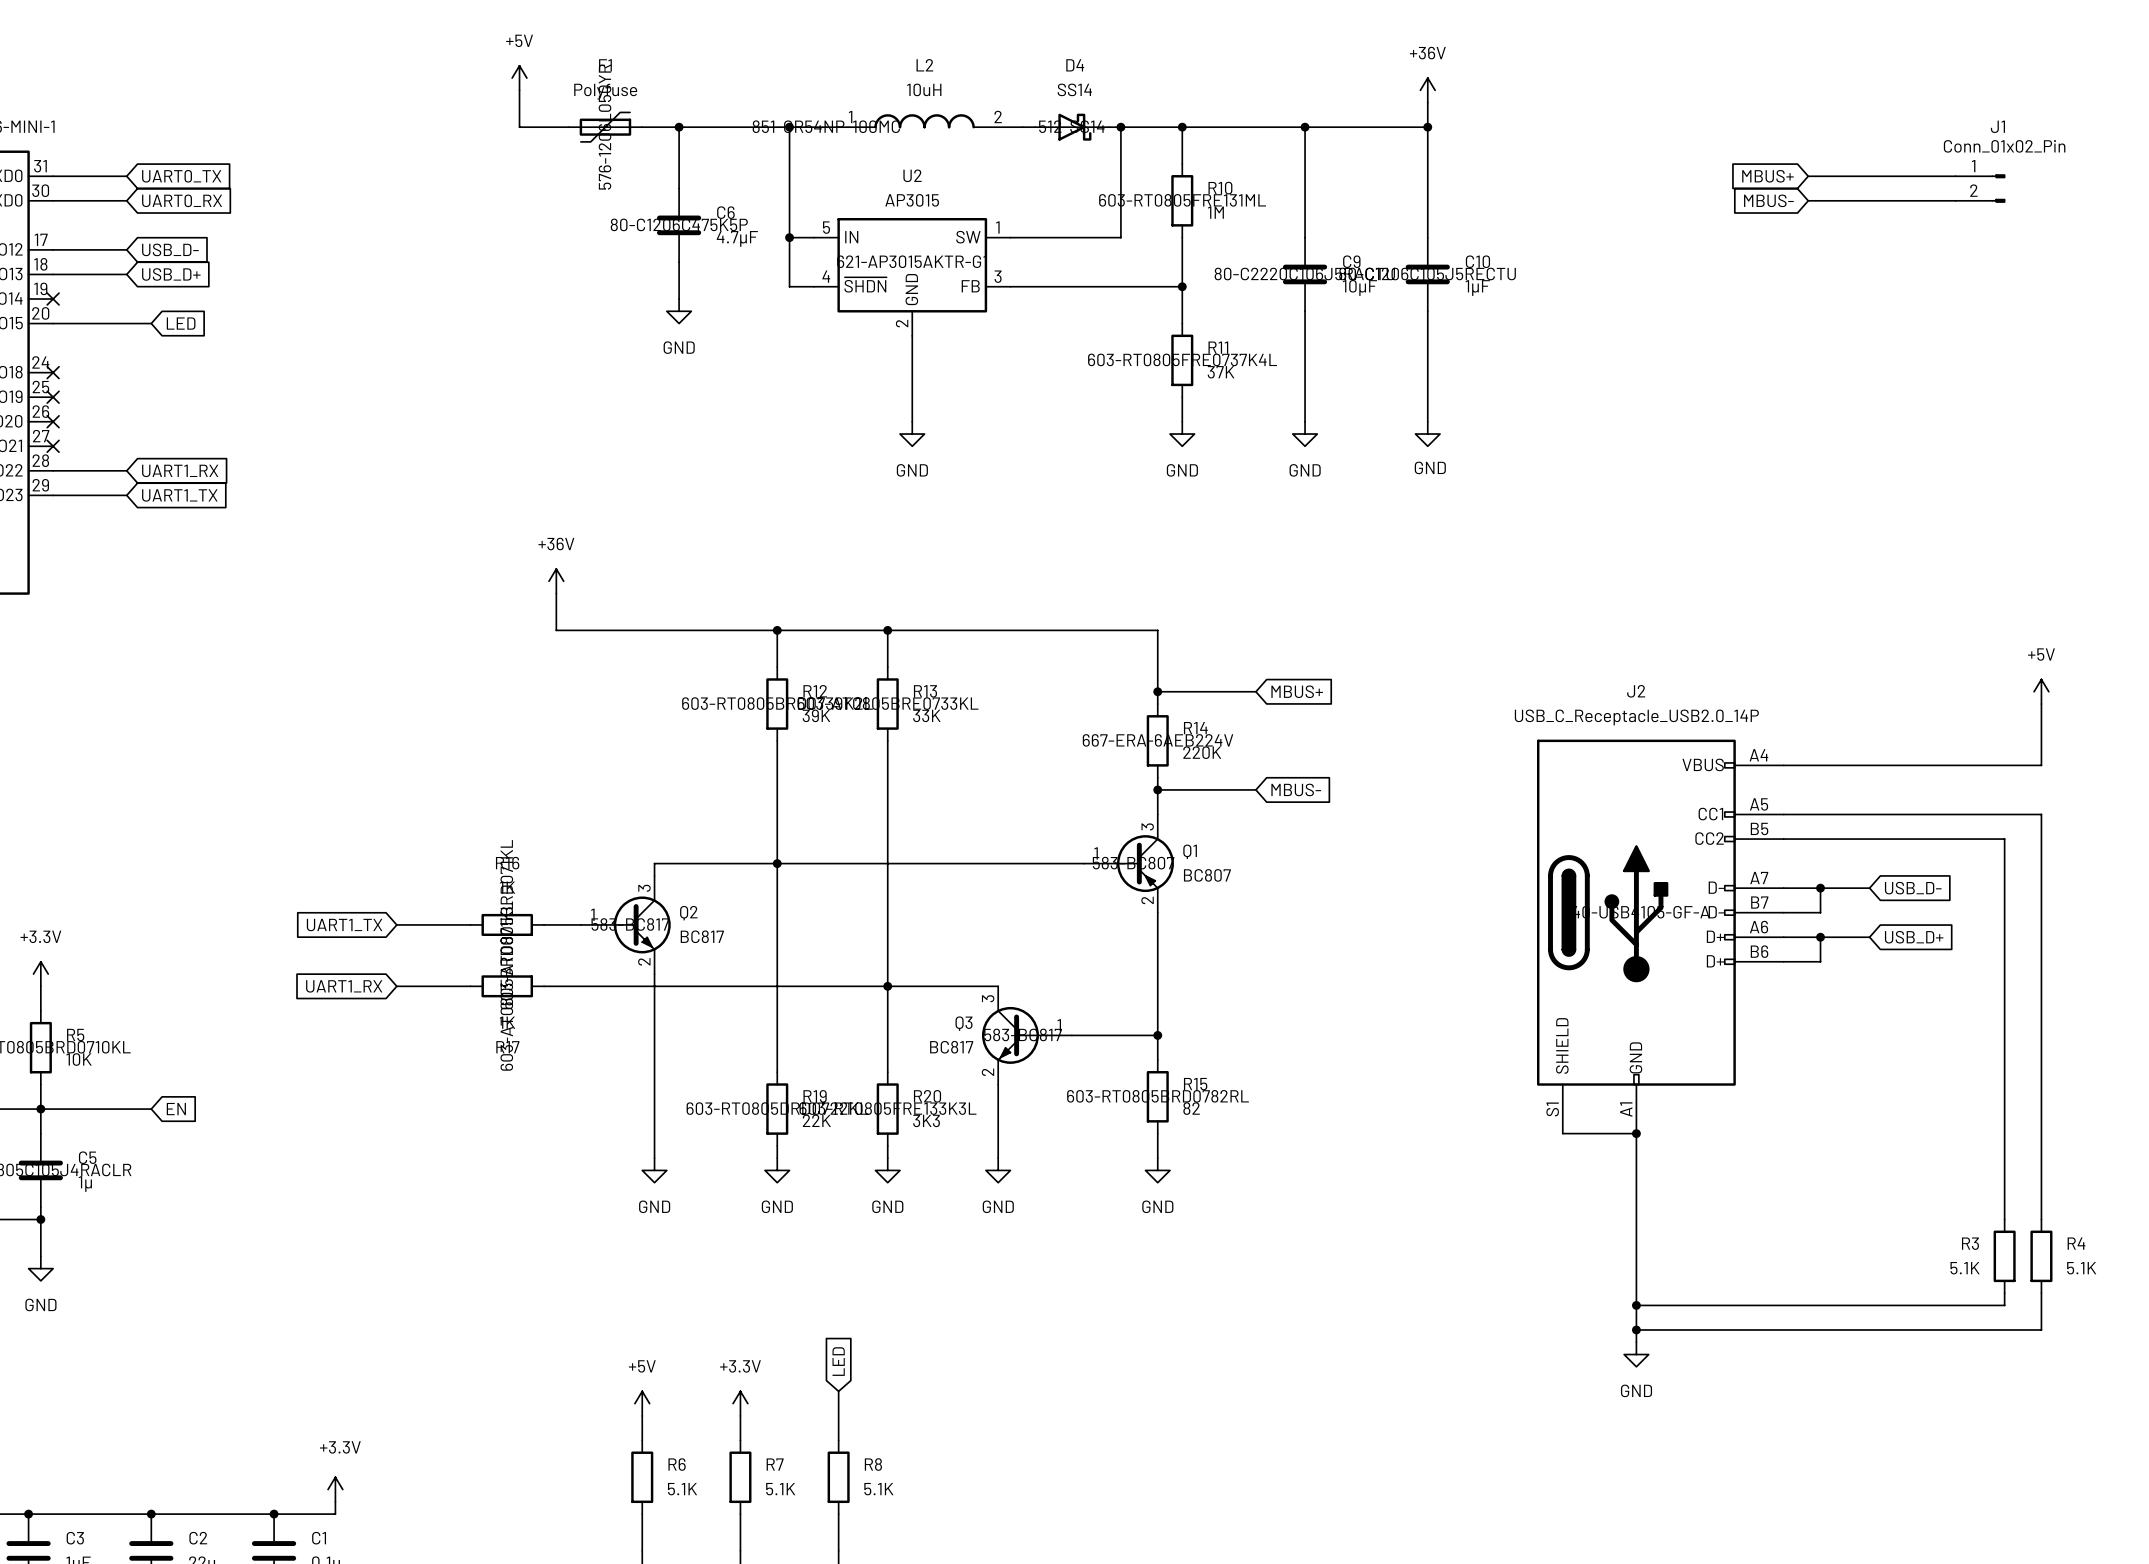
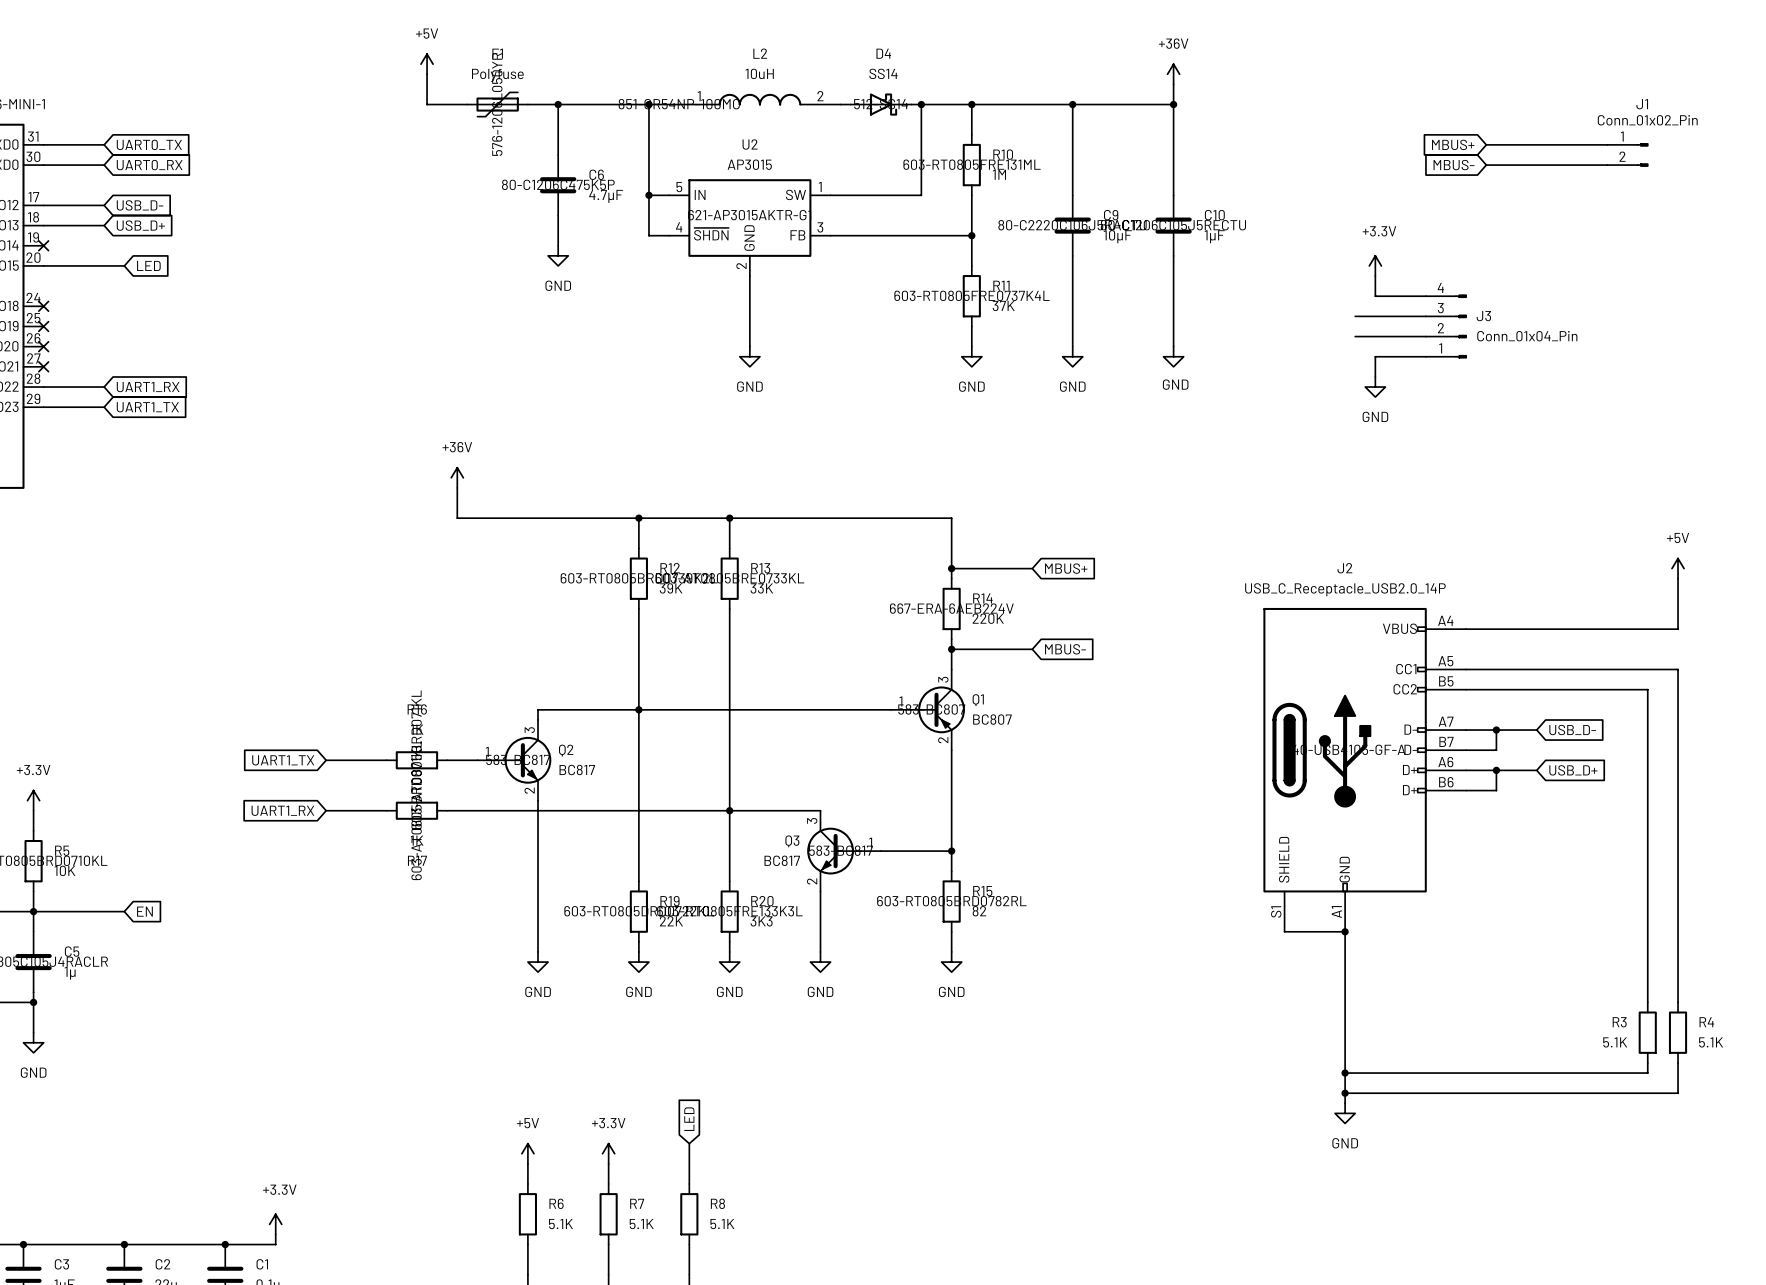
power symbol: none -> +3.3V (1375, 265)
wire: none -> (1375, 276) (1375, 296) (1425, 296)
wire: none -> (1355, 316) (1425, 316)
J3: none -> Conn_01x04_Pin (1446, 326)
wire: none -> (1355, 336) (1425, 336)
wire: none -> (1425, 356) (1375, 356) (1375, 376)
power symbol: none -> GND (1375, 387)

